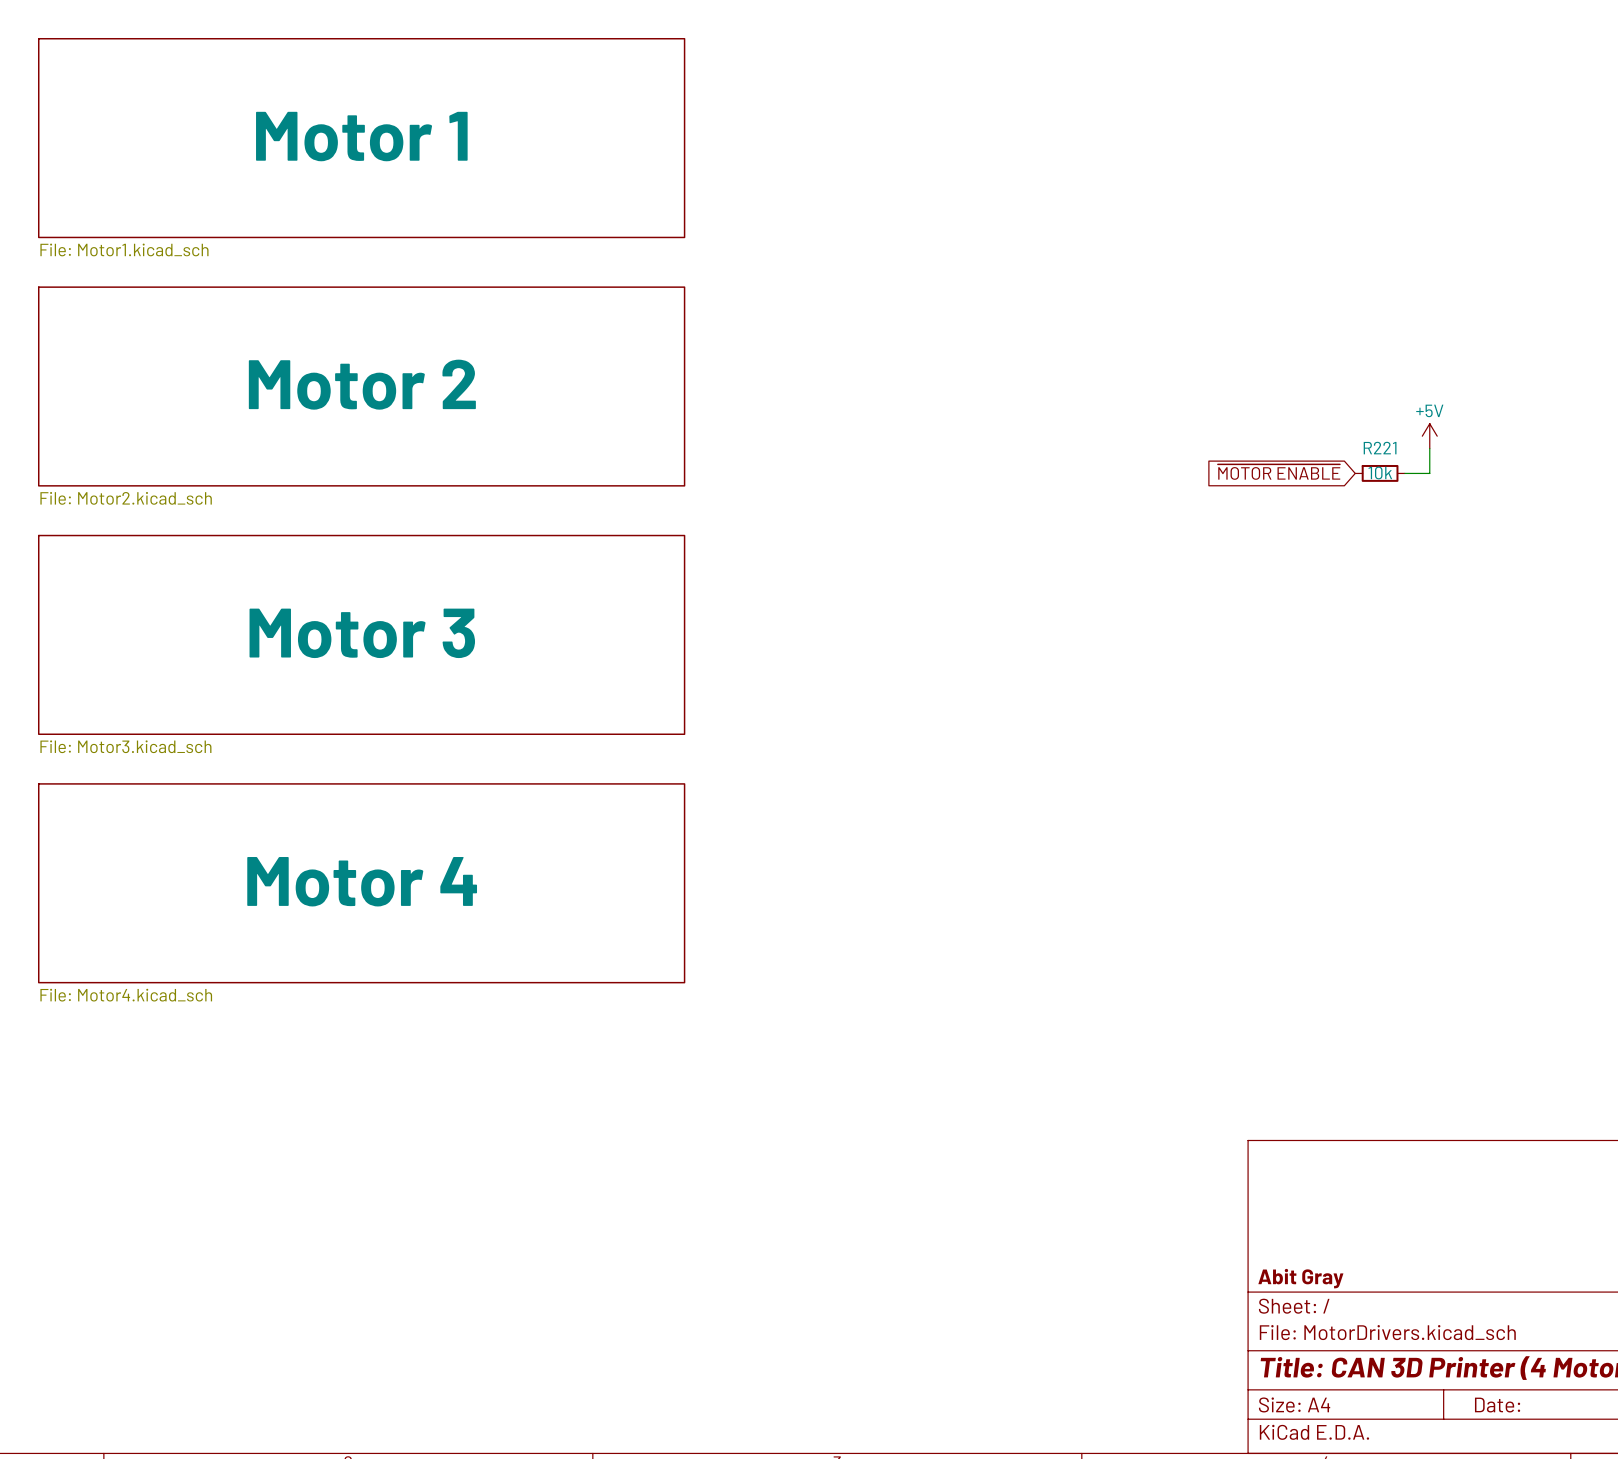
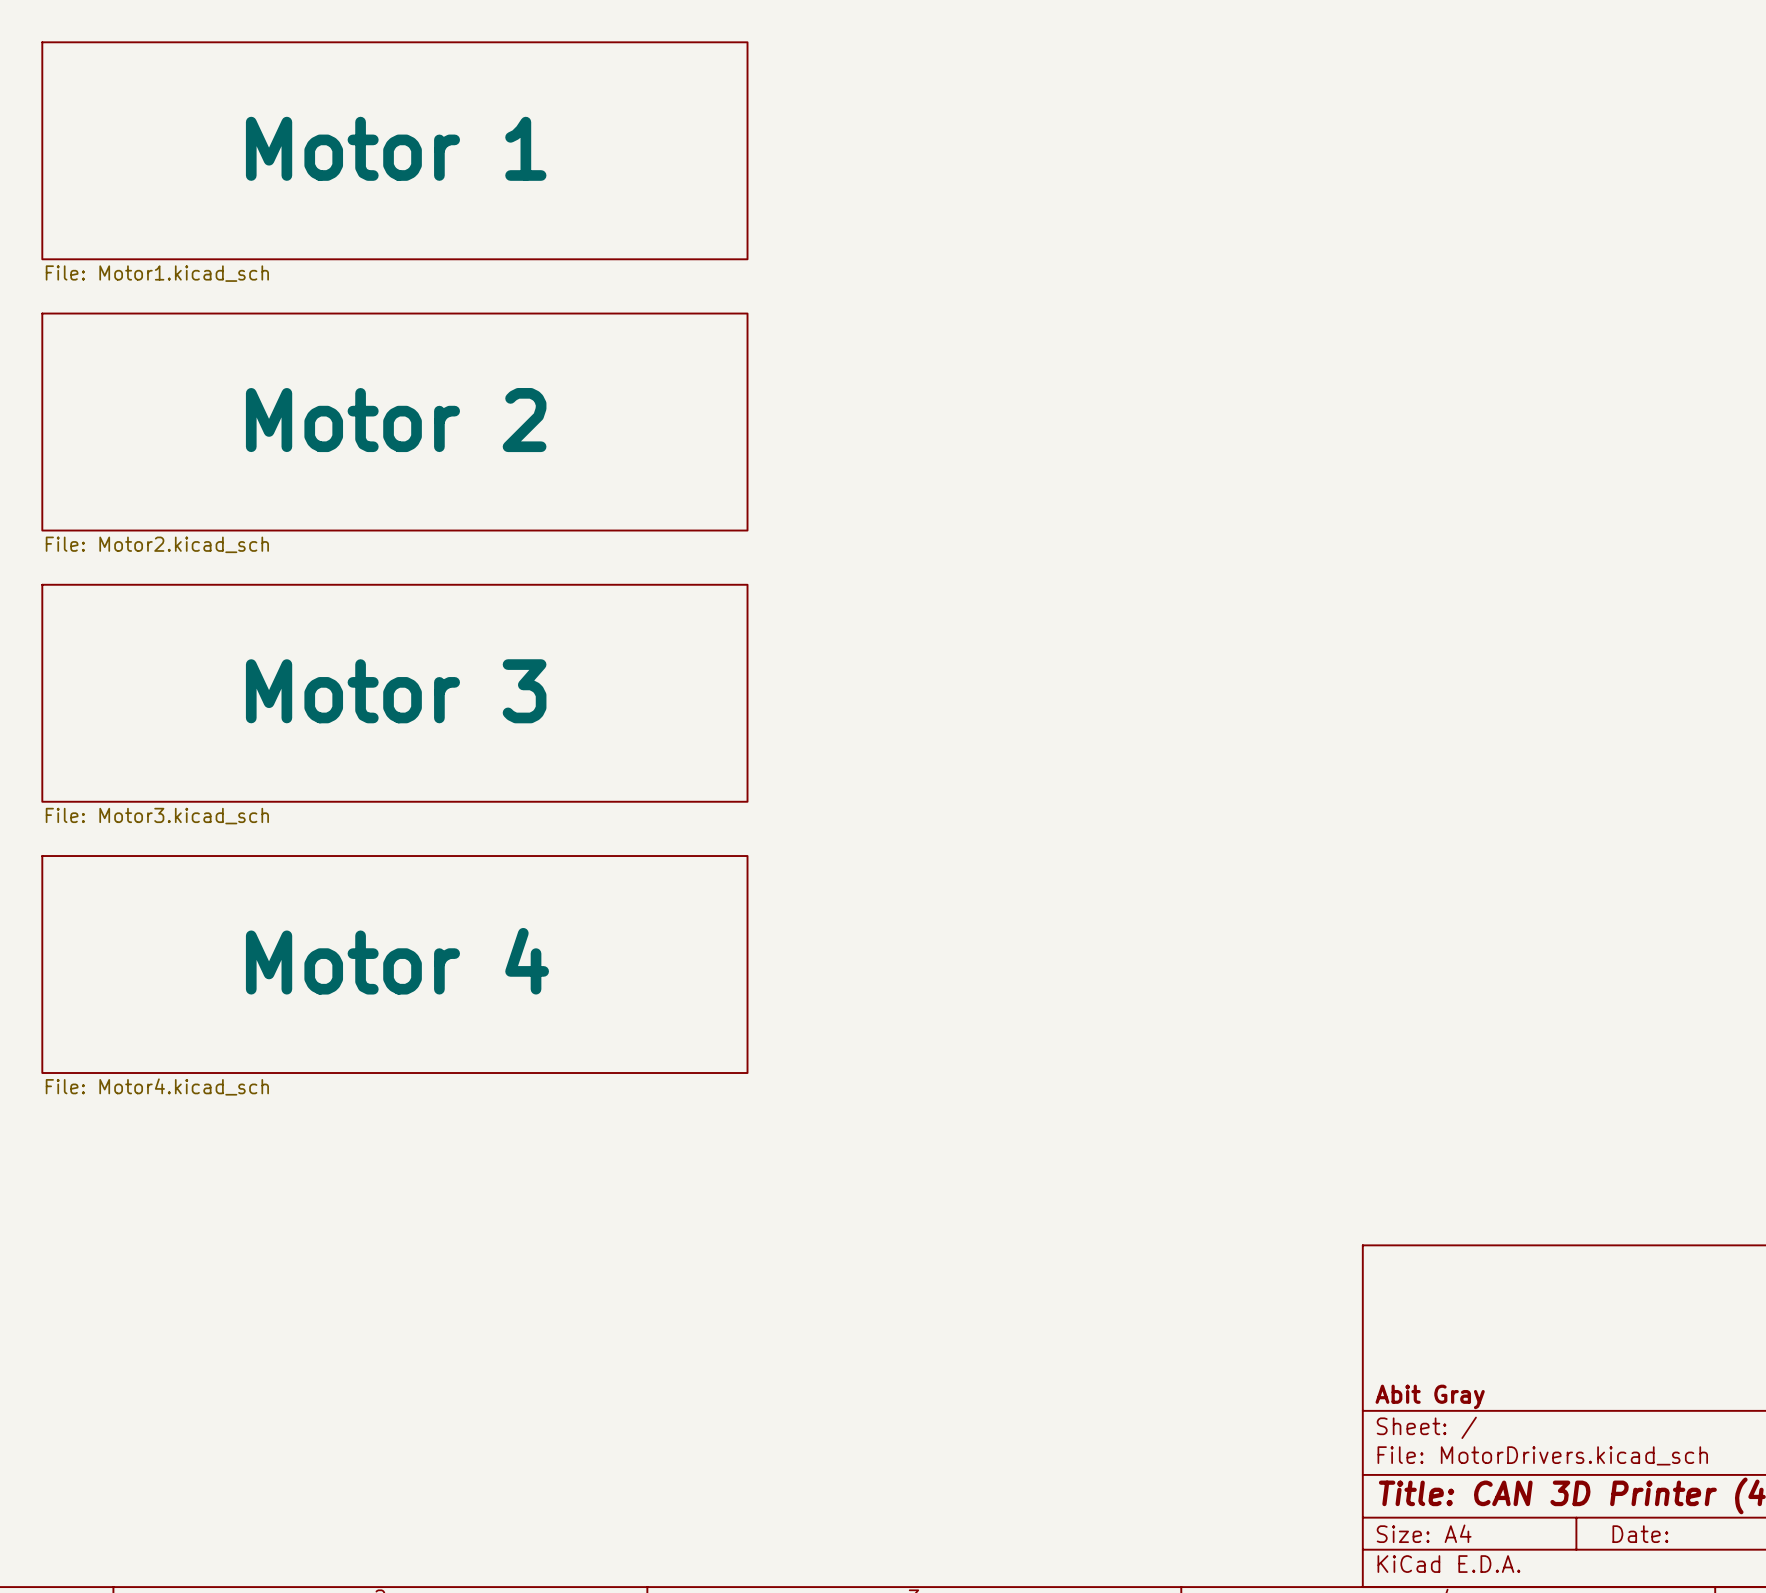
power symbol: +5V (1429, 436) -> none
wire: (1429, 448) (1429, 473) (1404, 473) -> none
global label: ~{MOTOR ENABLE} (1279, 472) -> none
R221: 10k (1380, 473) -> none

